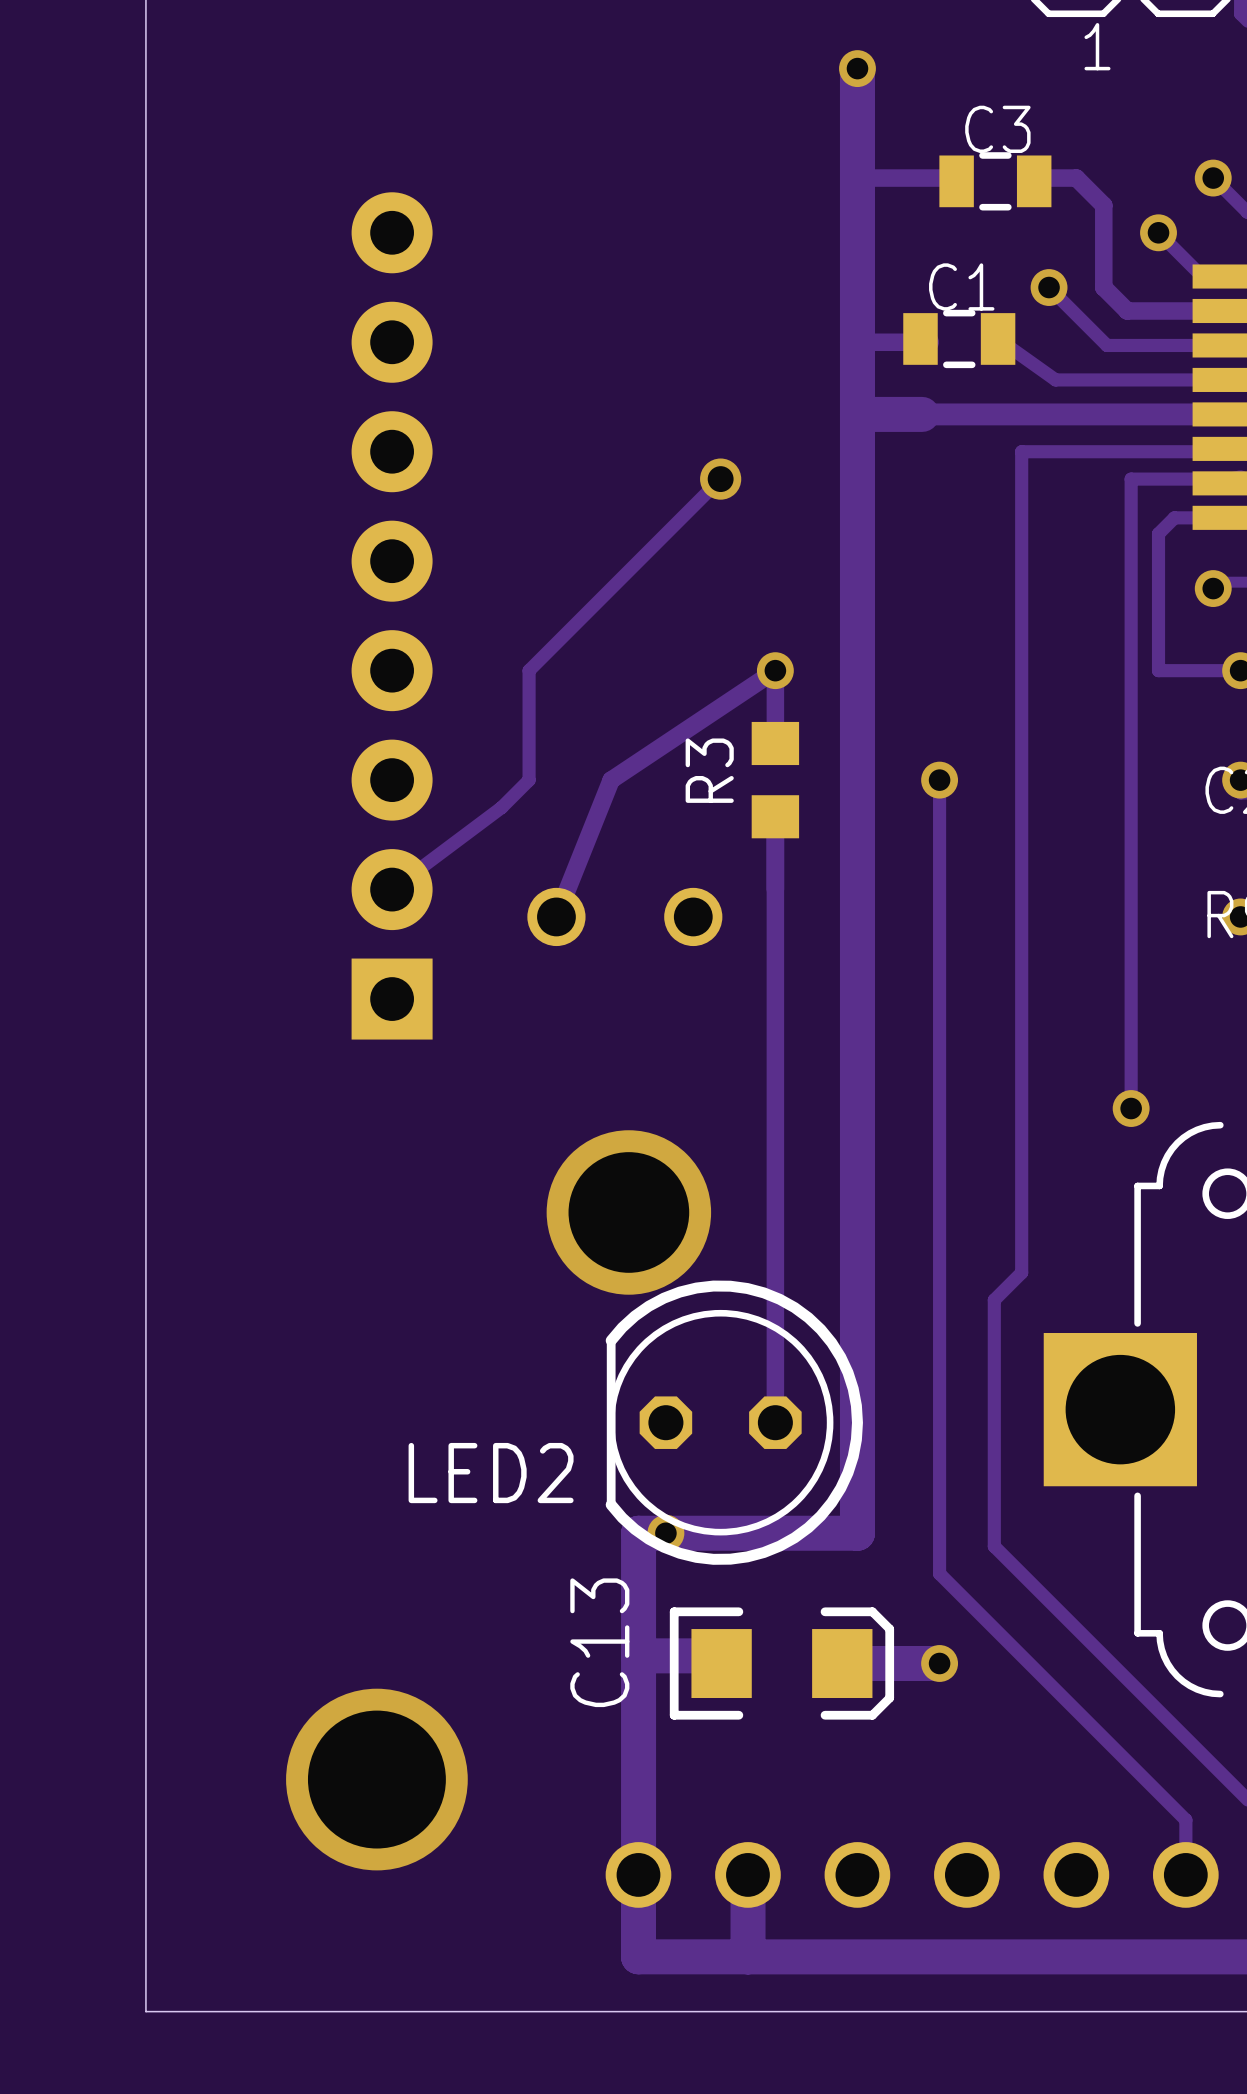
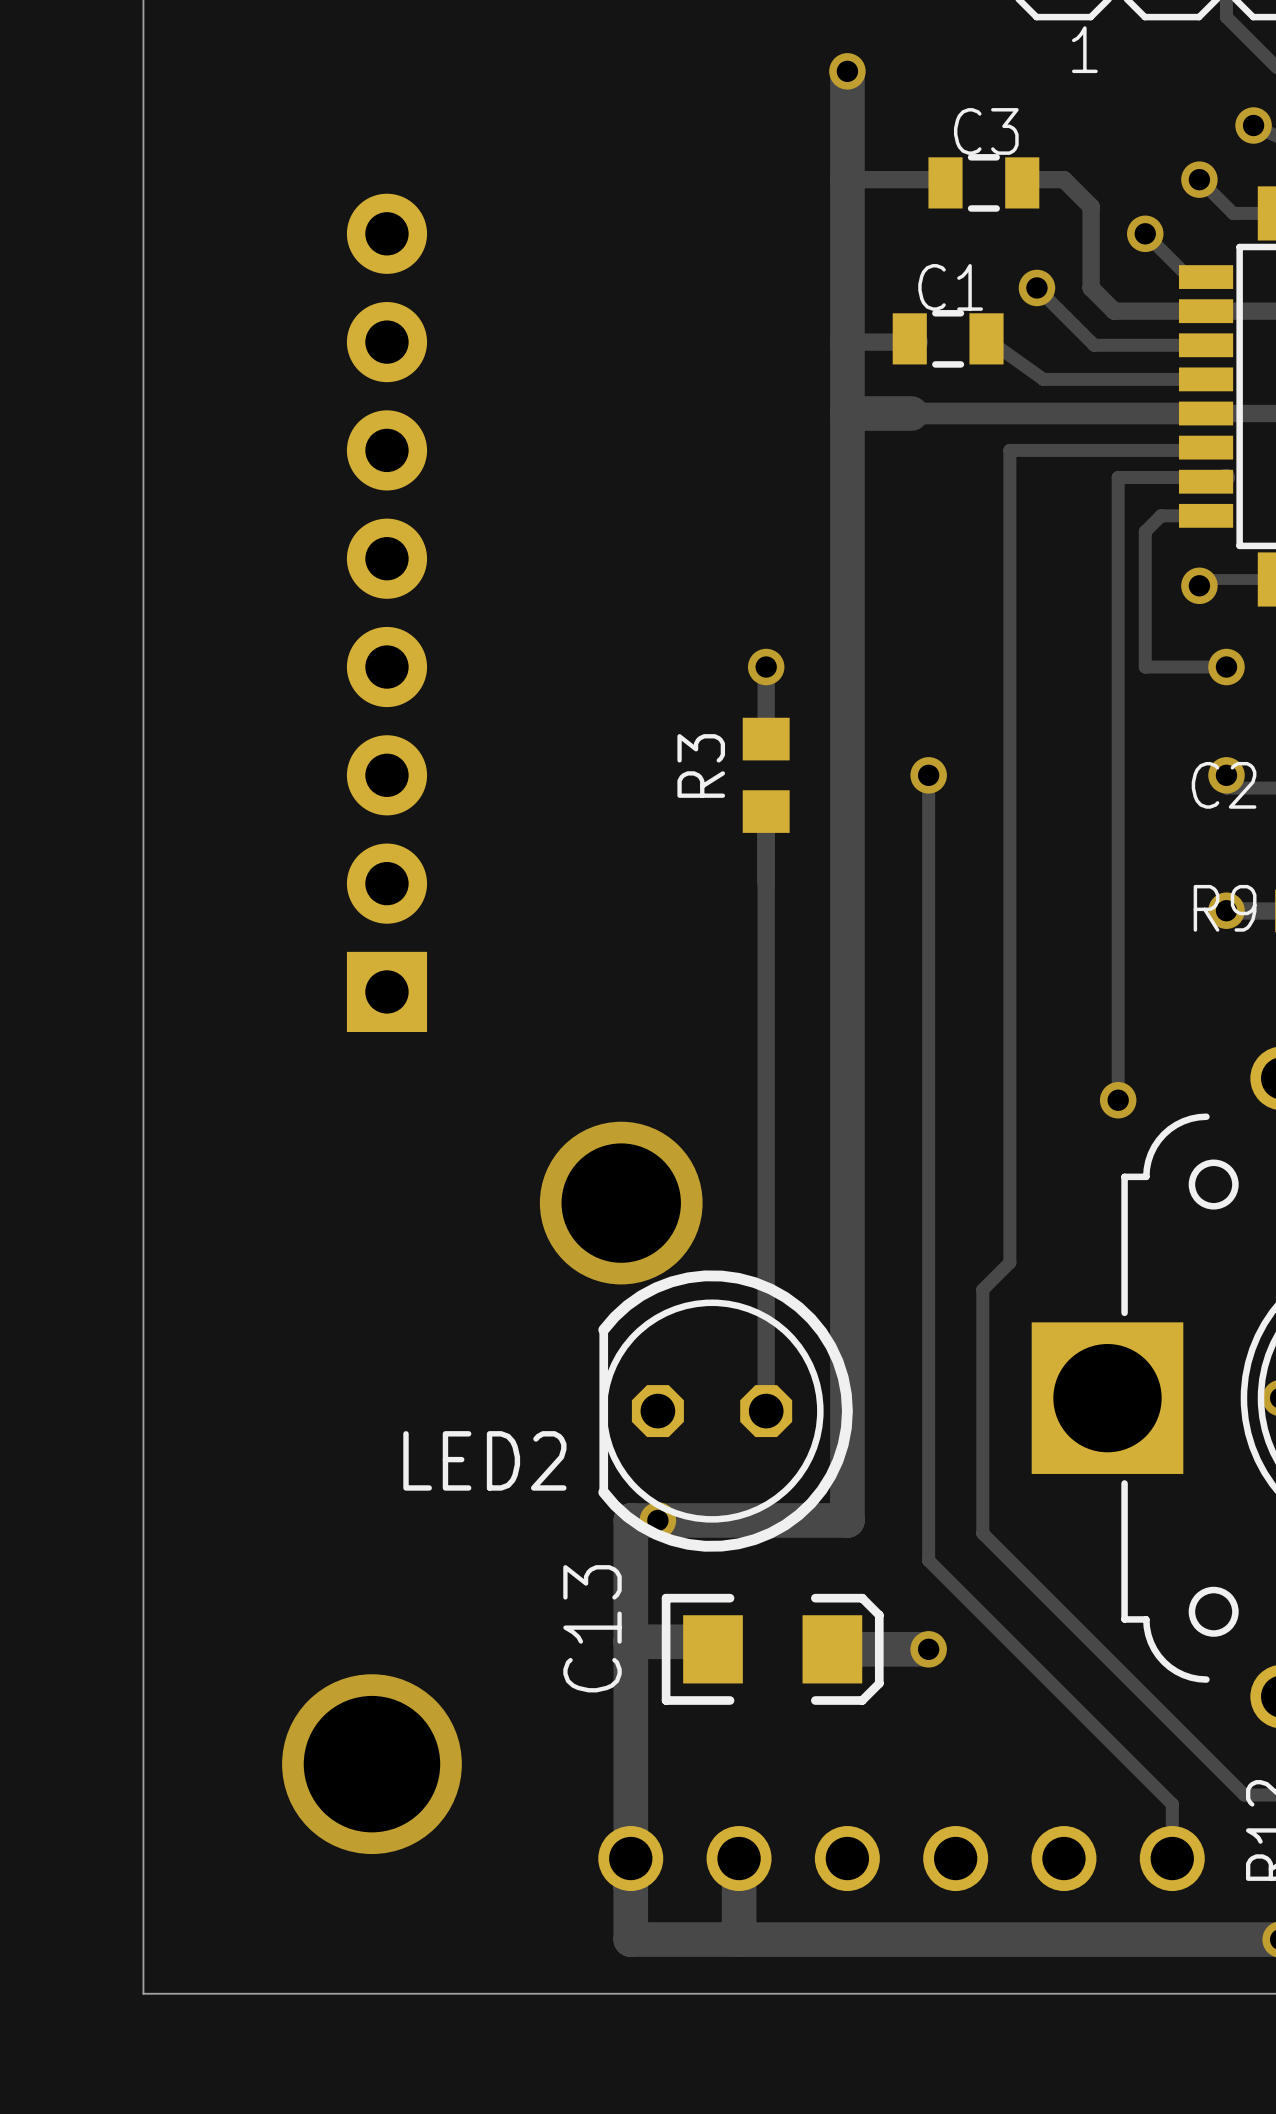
track: (720, 479) (529, 670) (529, 780) (501, 807) (392, 889) -> none
via: (720, 479) -> none
track: (775, 670) (611, 780) (556, 916) -> none
part: (556, 916) -> none
part: (693, 916) -> none

